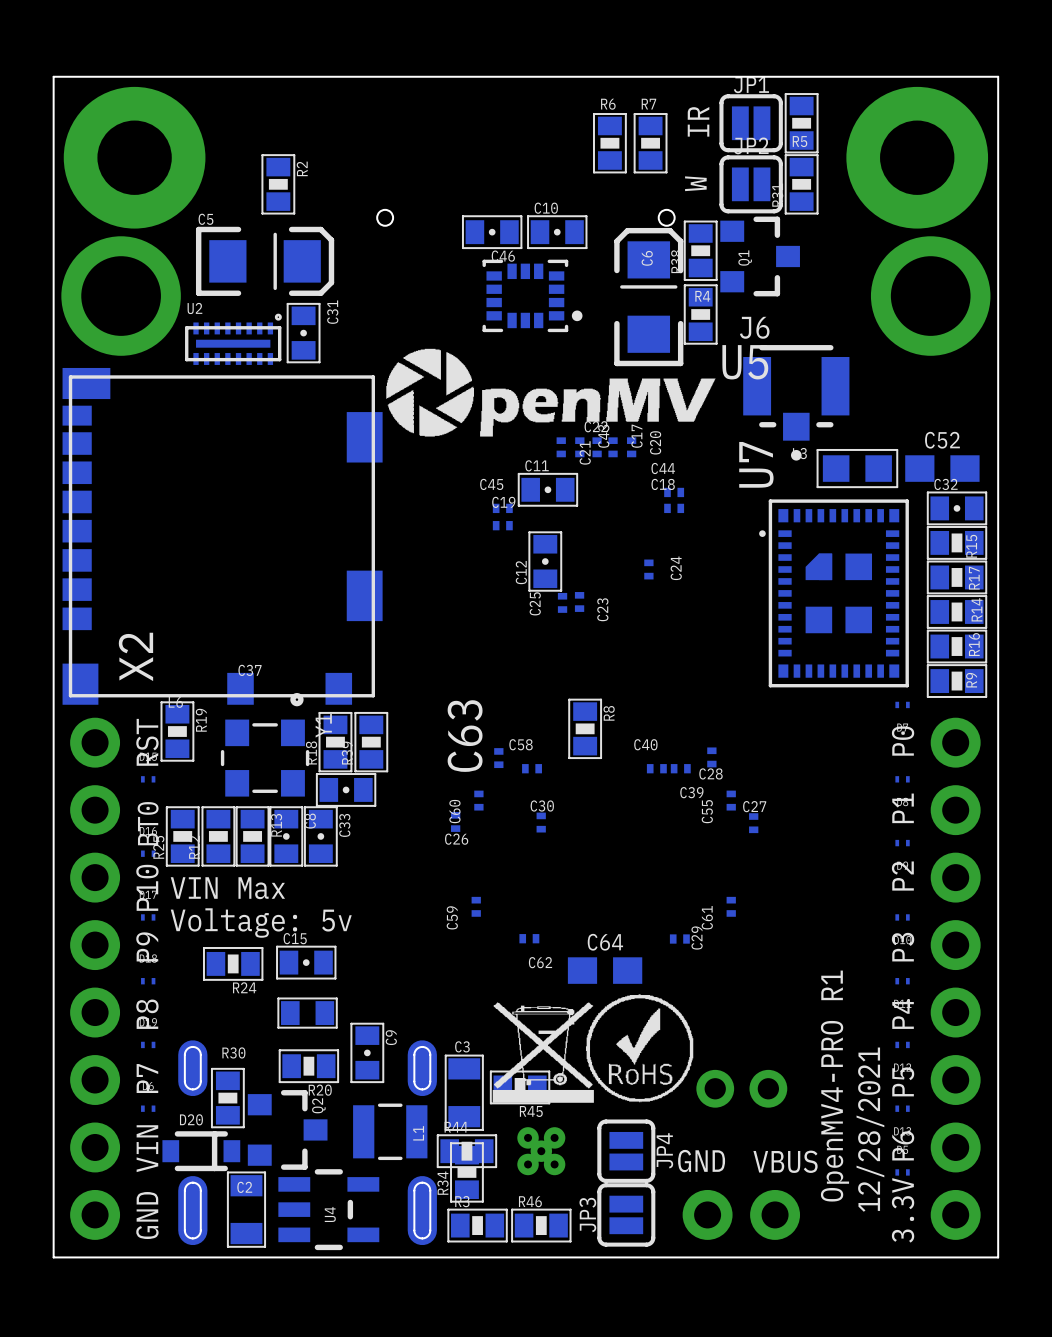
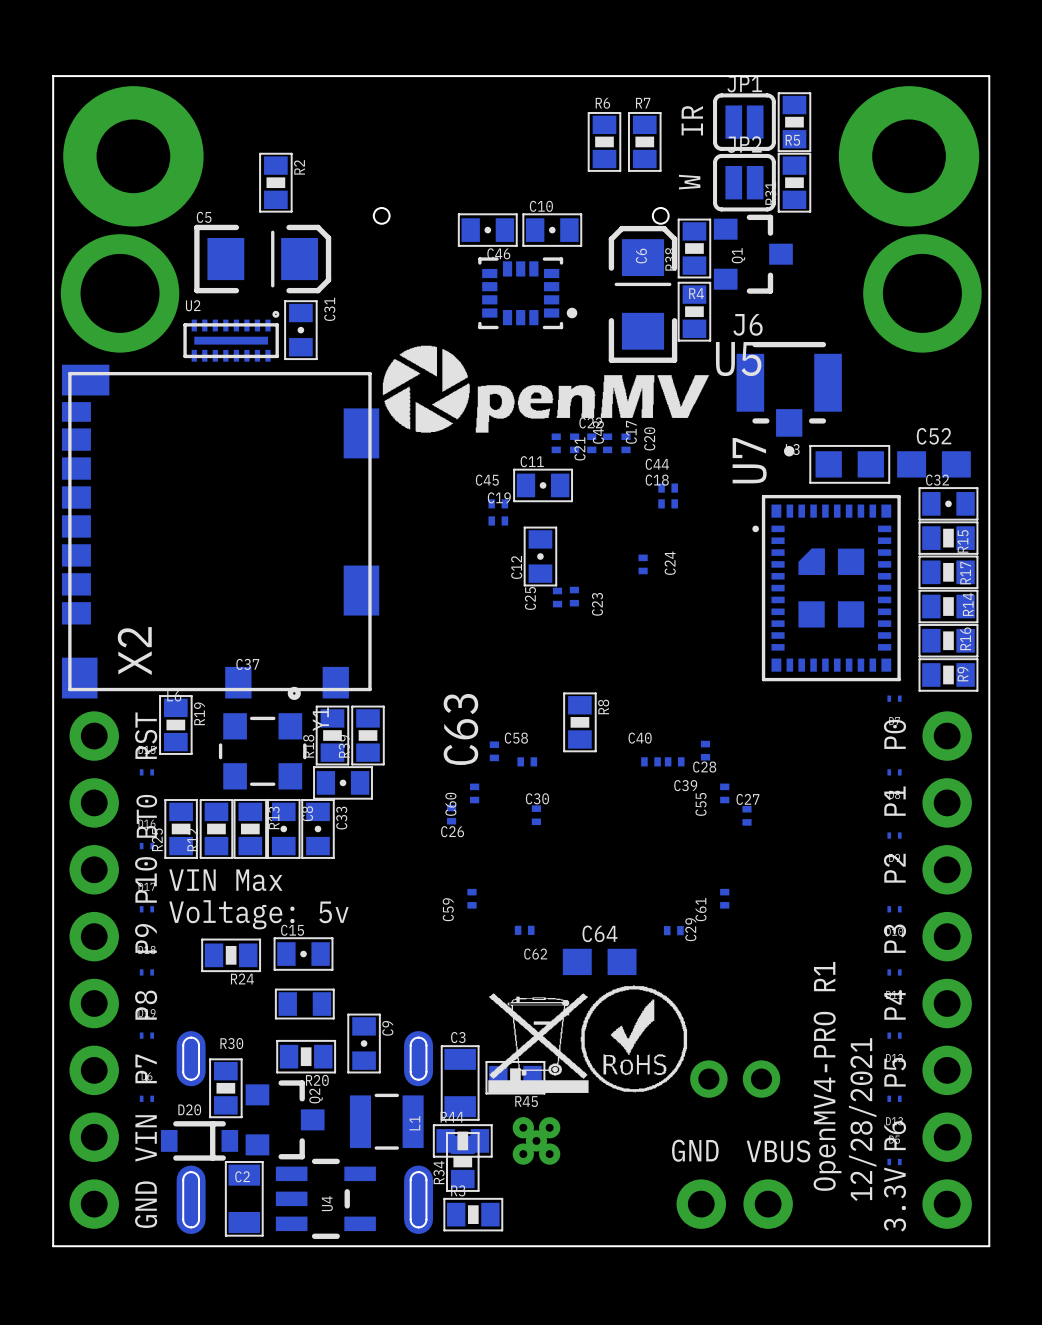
JP4: (626, 1151) -> none
JP3: (626, 1214) -> none
R46: (541, 1225) -> none

